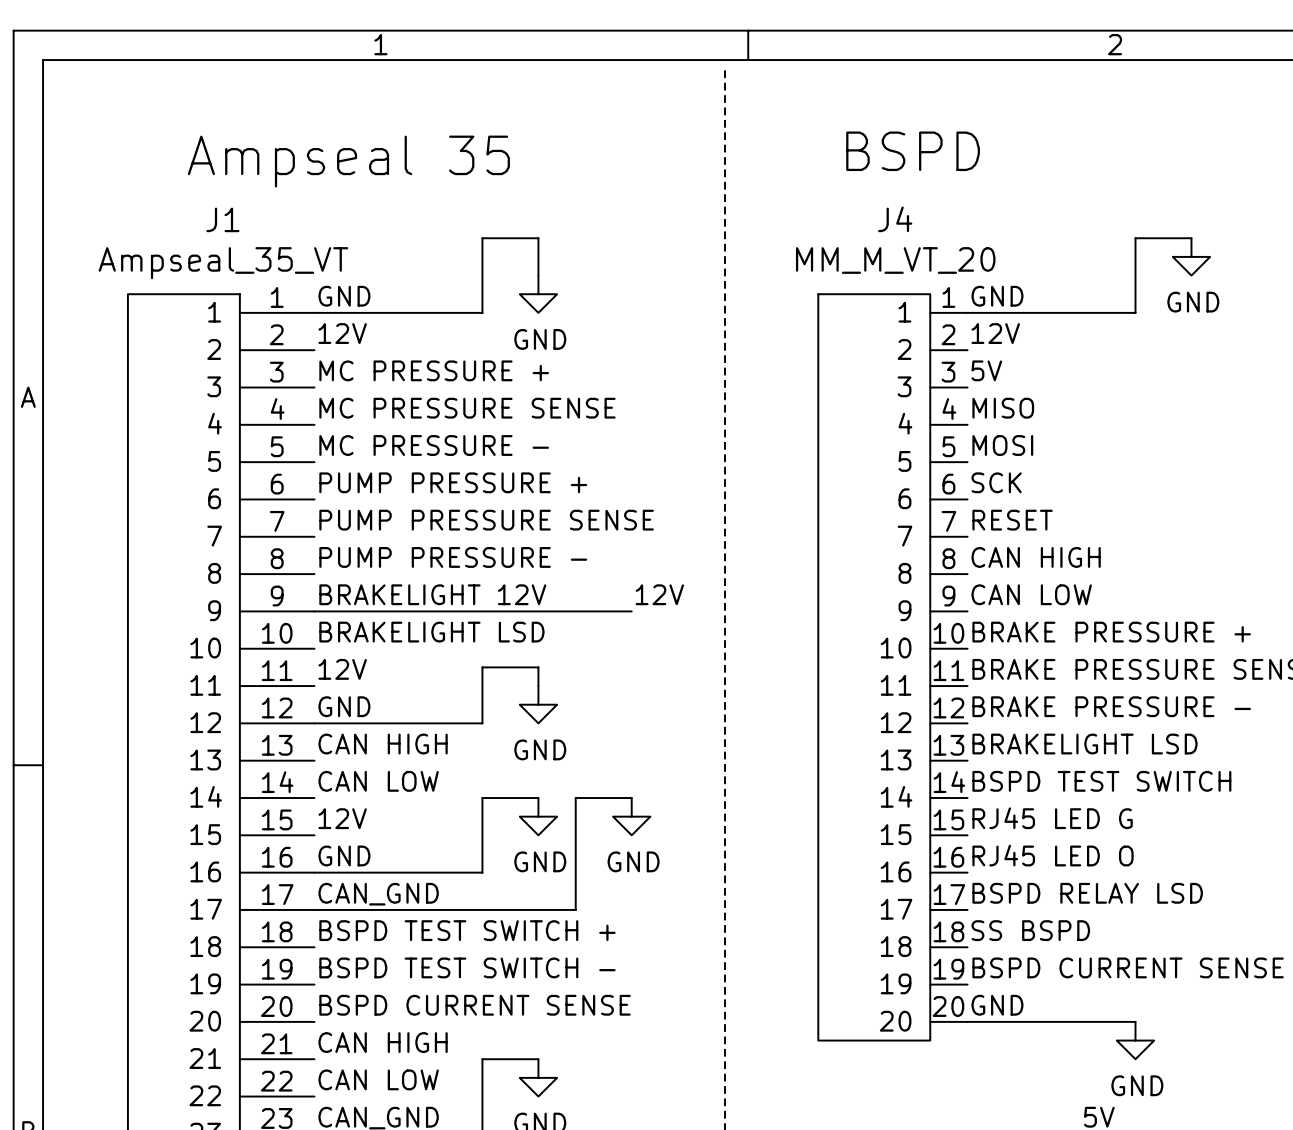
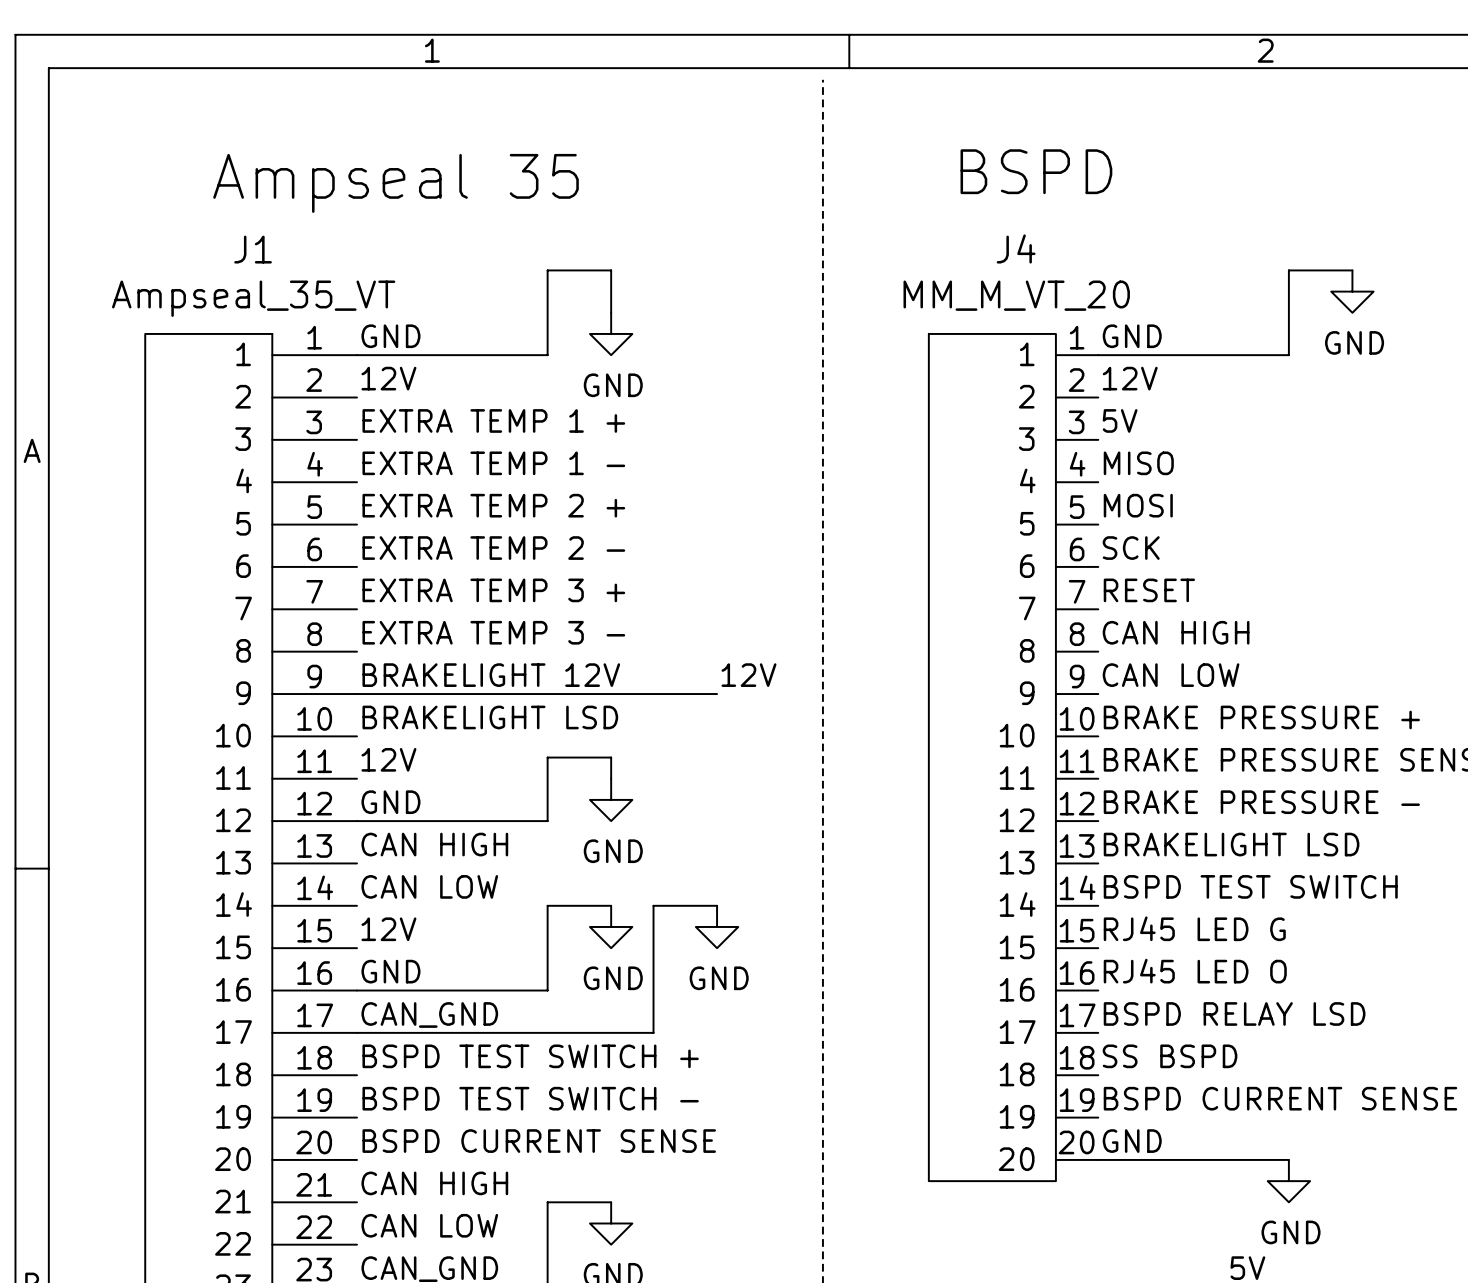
label: MC PRESSURE + (434, 370) -> EXTRA TEMP 1 + (493, 420)
label: MC PRESSURE SENSE (467, 408) -> EXTRA TEMP 1 - (493, 463)
label: MC PRESSURE - (434, 445) -> EXTRA TEMP 2 + (493, 505)
label: PUMP PRESSURE + (453, 482) -> EXTRA TEMP 2 - (493, 548)
label: PUMP PRESSURE SENSE (486, 520) -> EXTRA TEMP 3 + (493, 590)
label: PUMP PRESSURE - (453, 557) -> EXTRA TEMP 3 - (493, 632)

